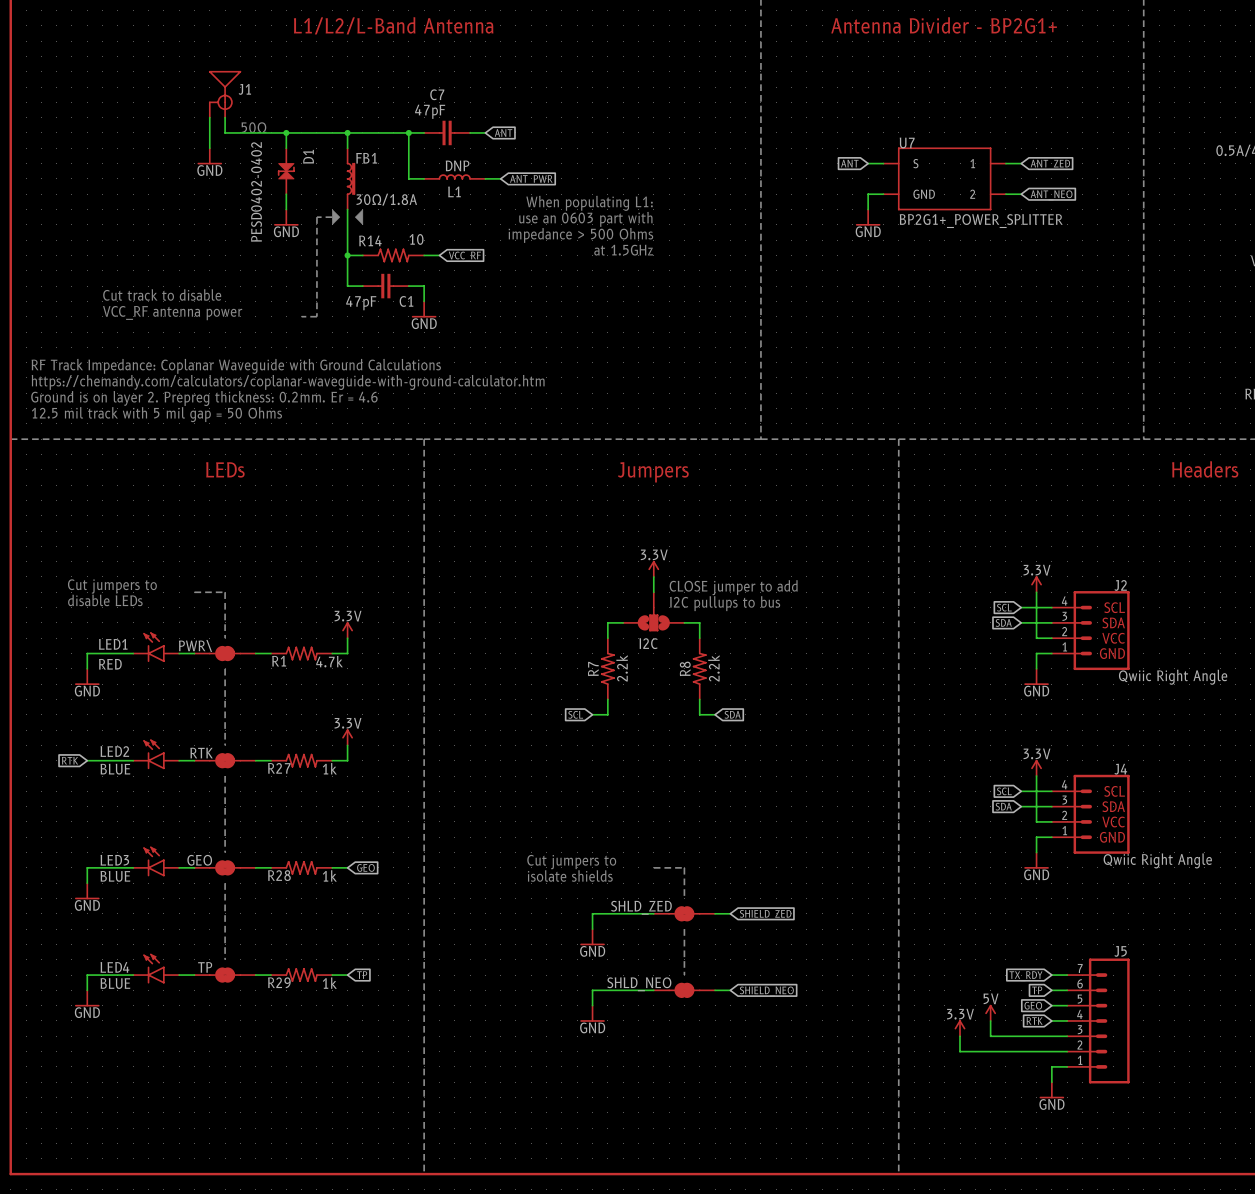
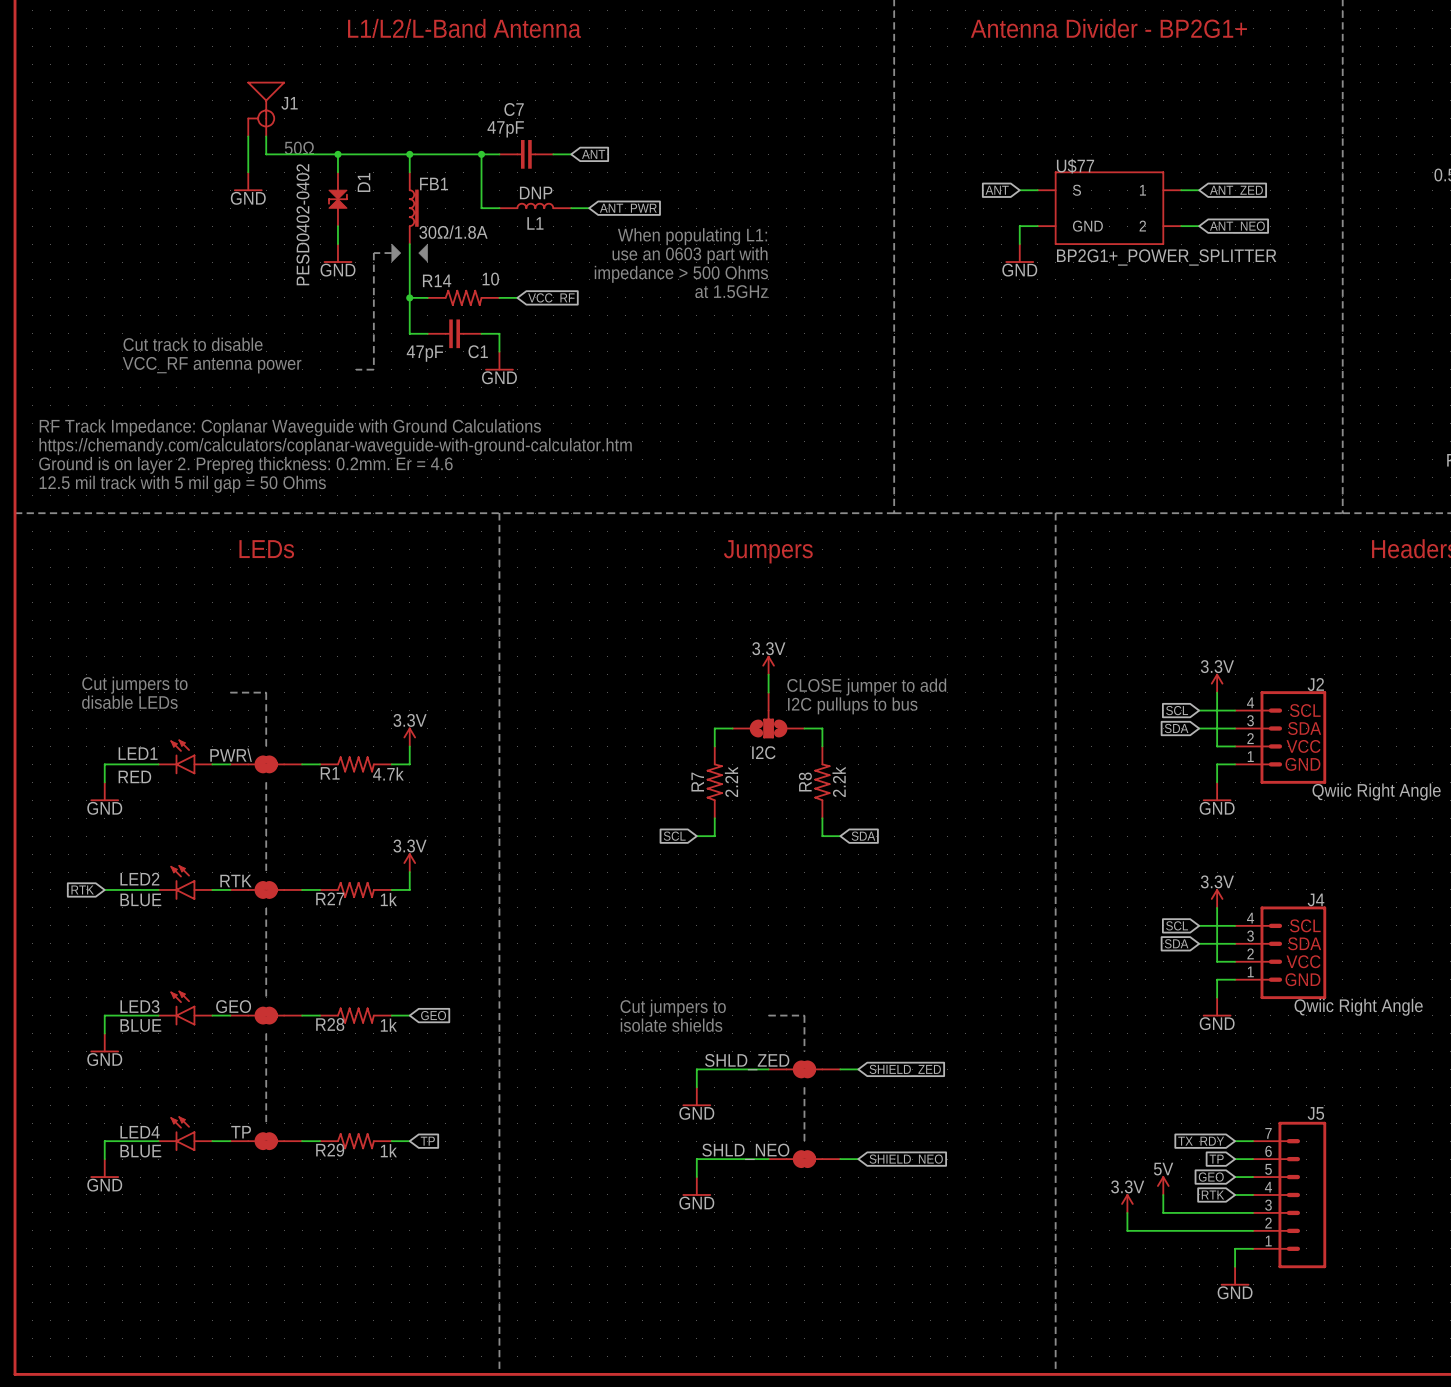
U7 name: U7 (907, 142) -> U$77 (1075, 166)

